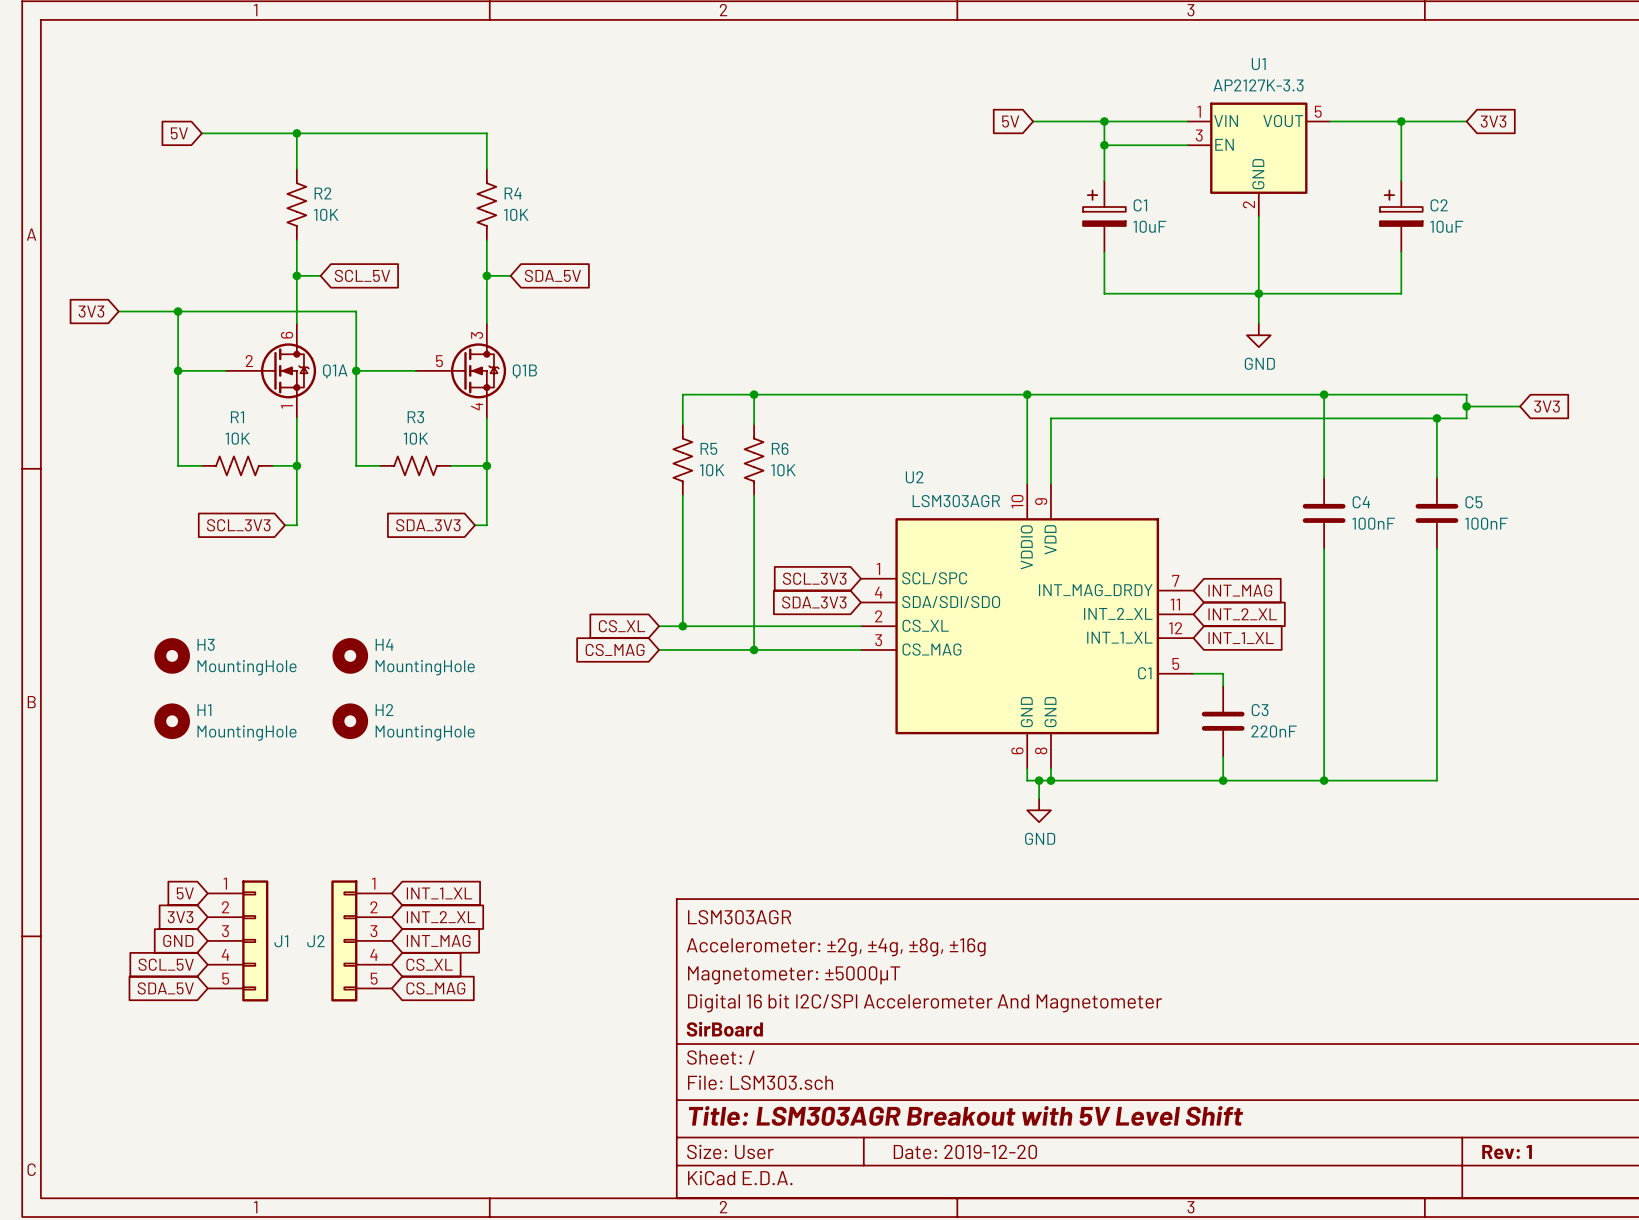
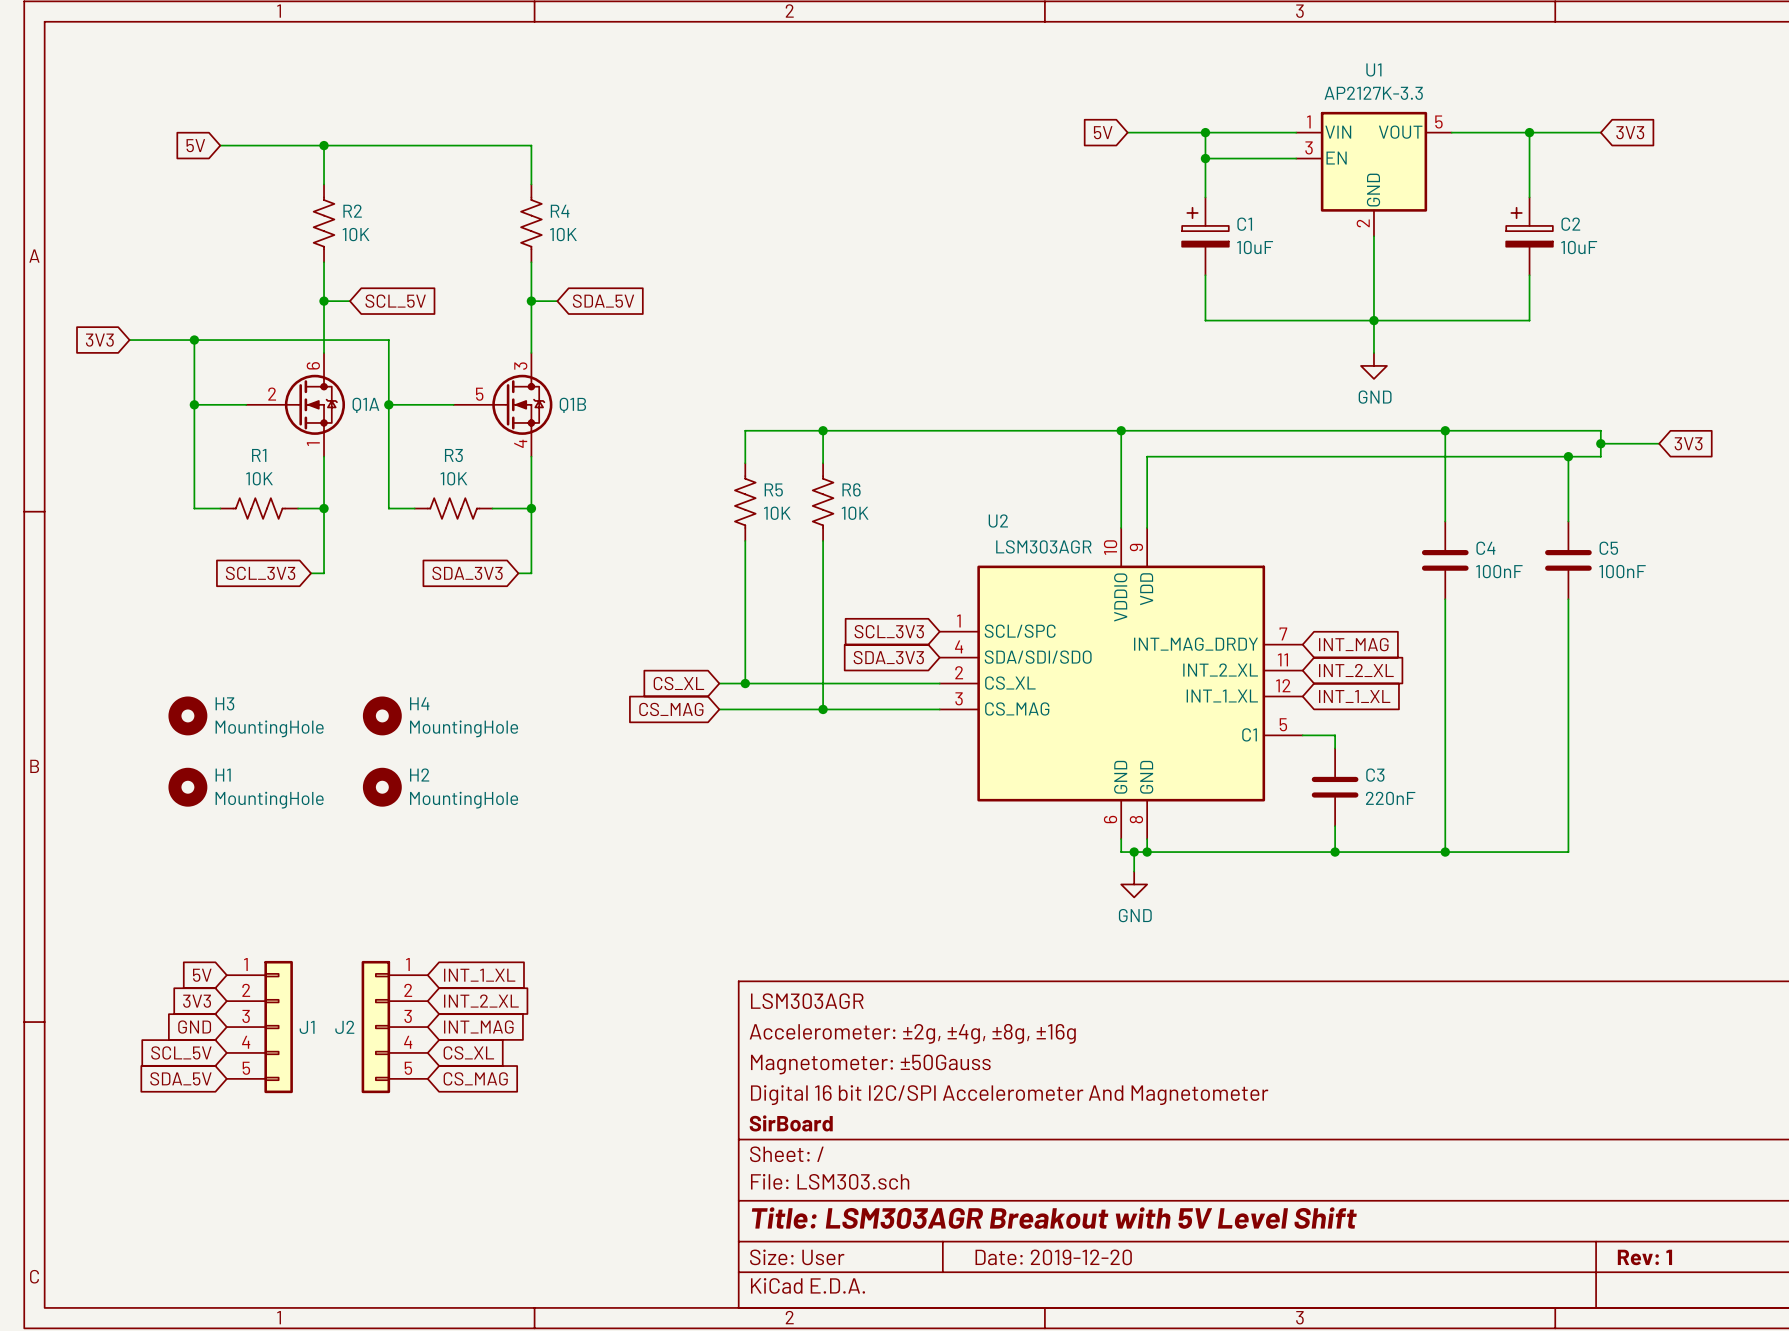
title block: Magnetometer: ±5000µT (794, 975) -> Magnetometer: ±50Gauss (870, 1064)

